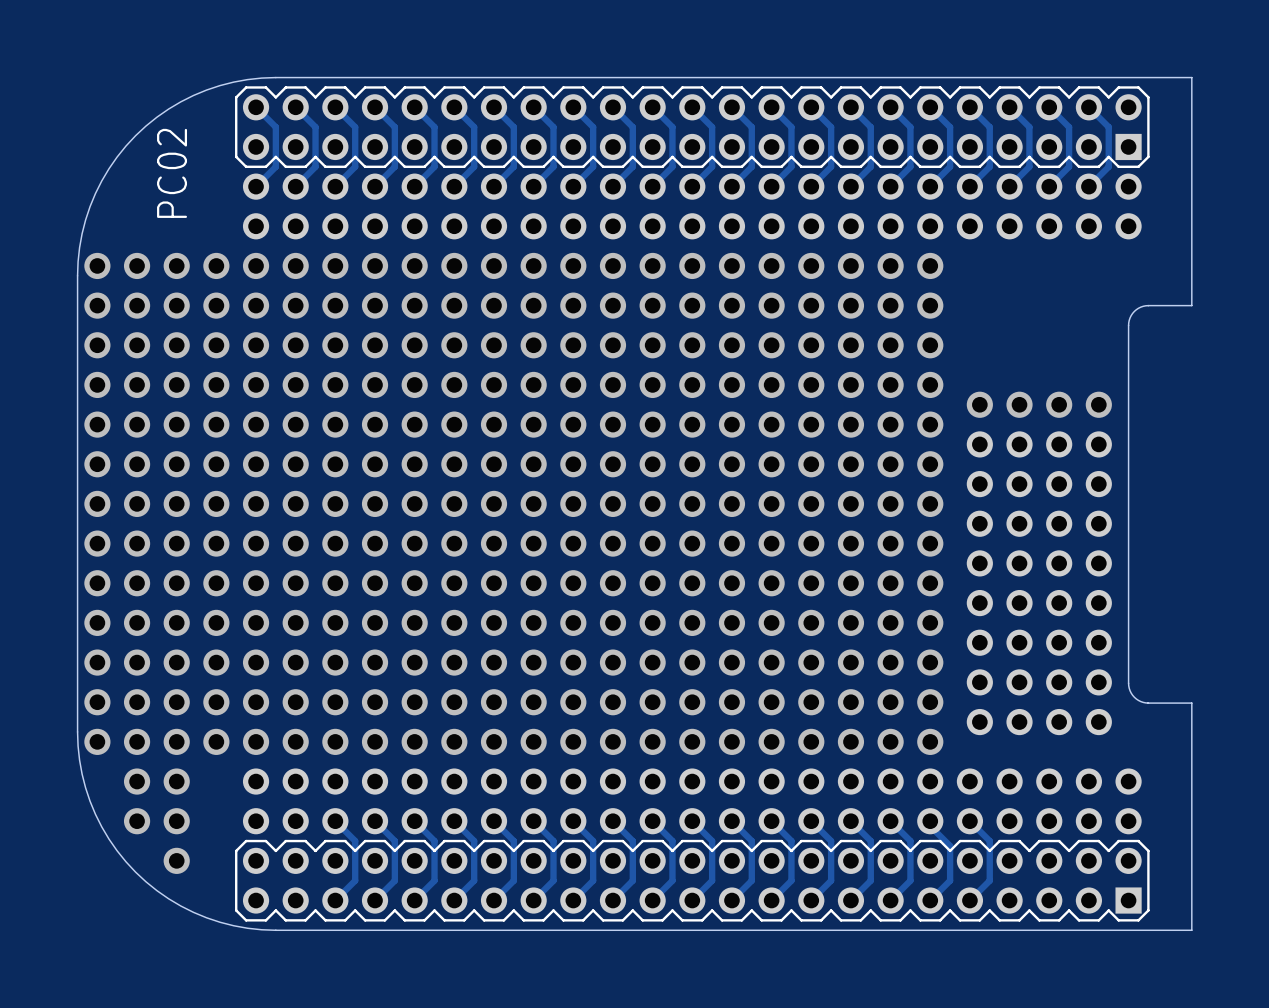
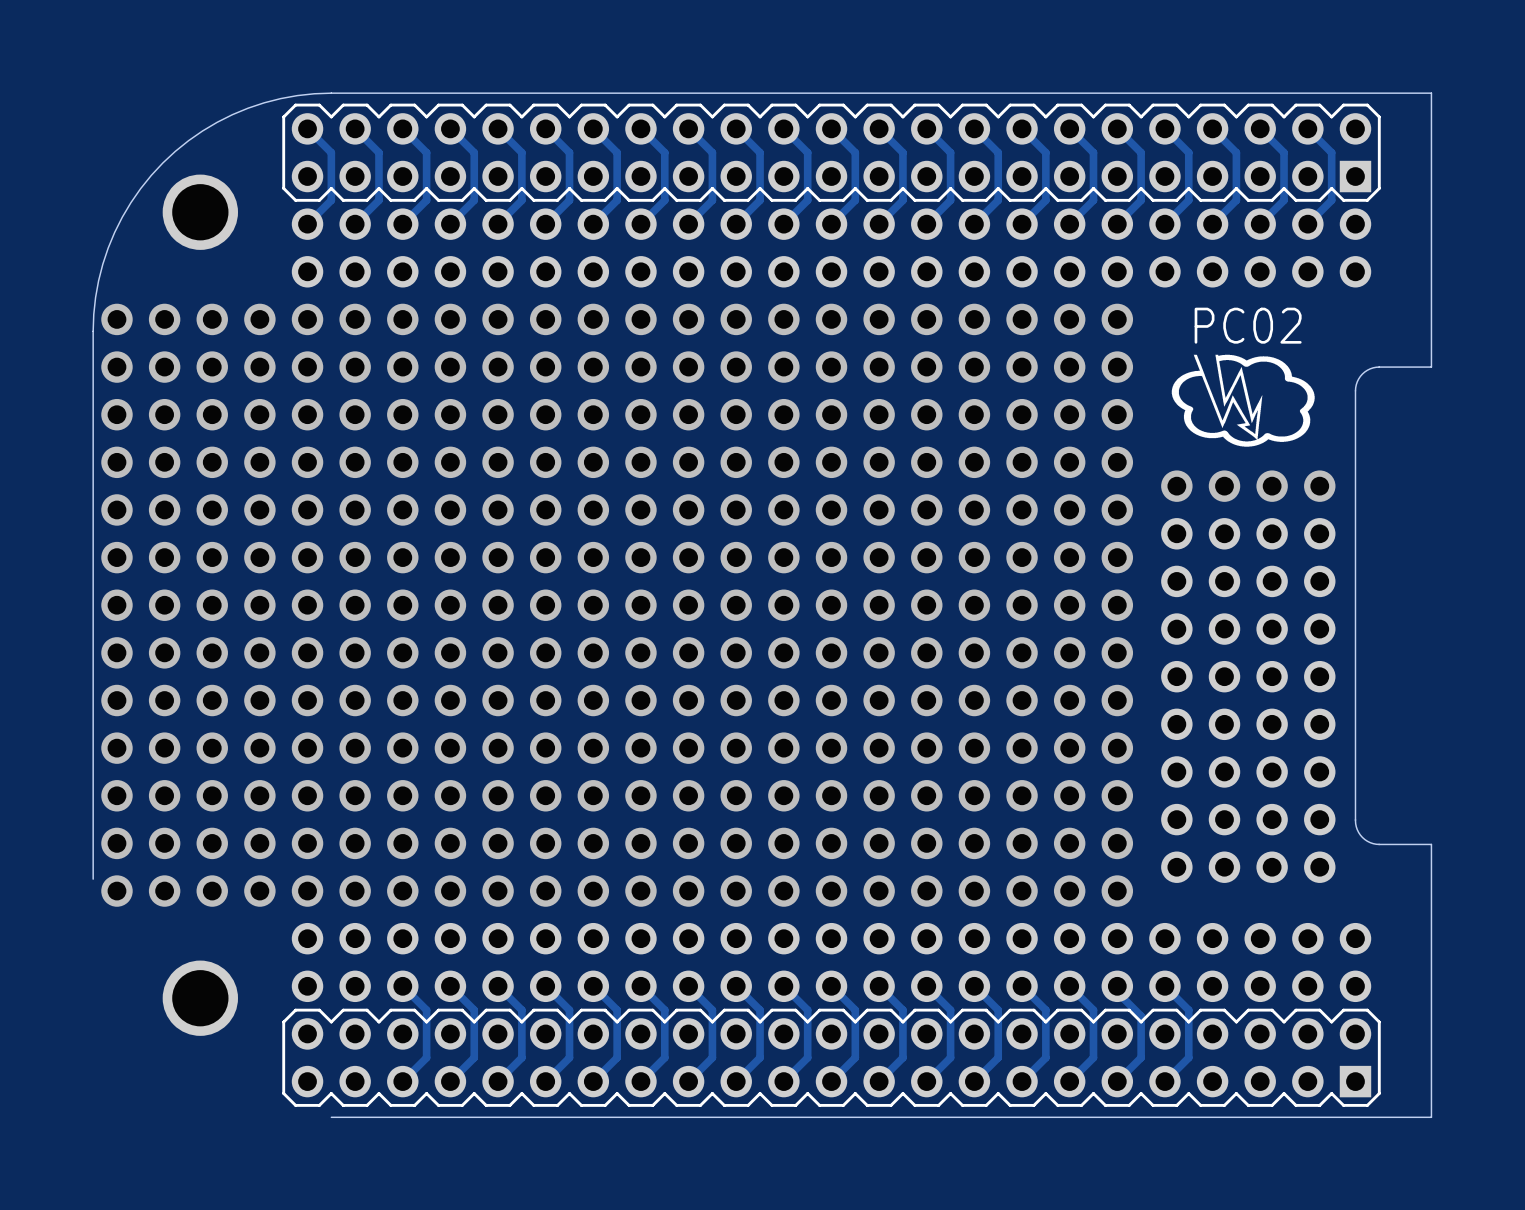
text: PC02 (172, 173) -> none
part: none -> (200, 212)
text: none -> PC02 (1248, 325)
drawing: none -> [1171, 354, 1315, 447]
board edge: (77, 731) (82, 774) (90, 801) (109, 839) (135, 872) (168, 898) (206, 917) (233, 925) (275, 930) -> none
via: (137, 781) -> none
via: (176, 781) -> none
via: (137, 821) -> none
via: (176, 821) -> none
part: none -> (200, 998)
via: (176, 860) -> none

